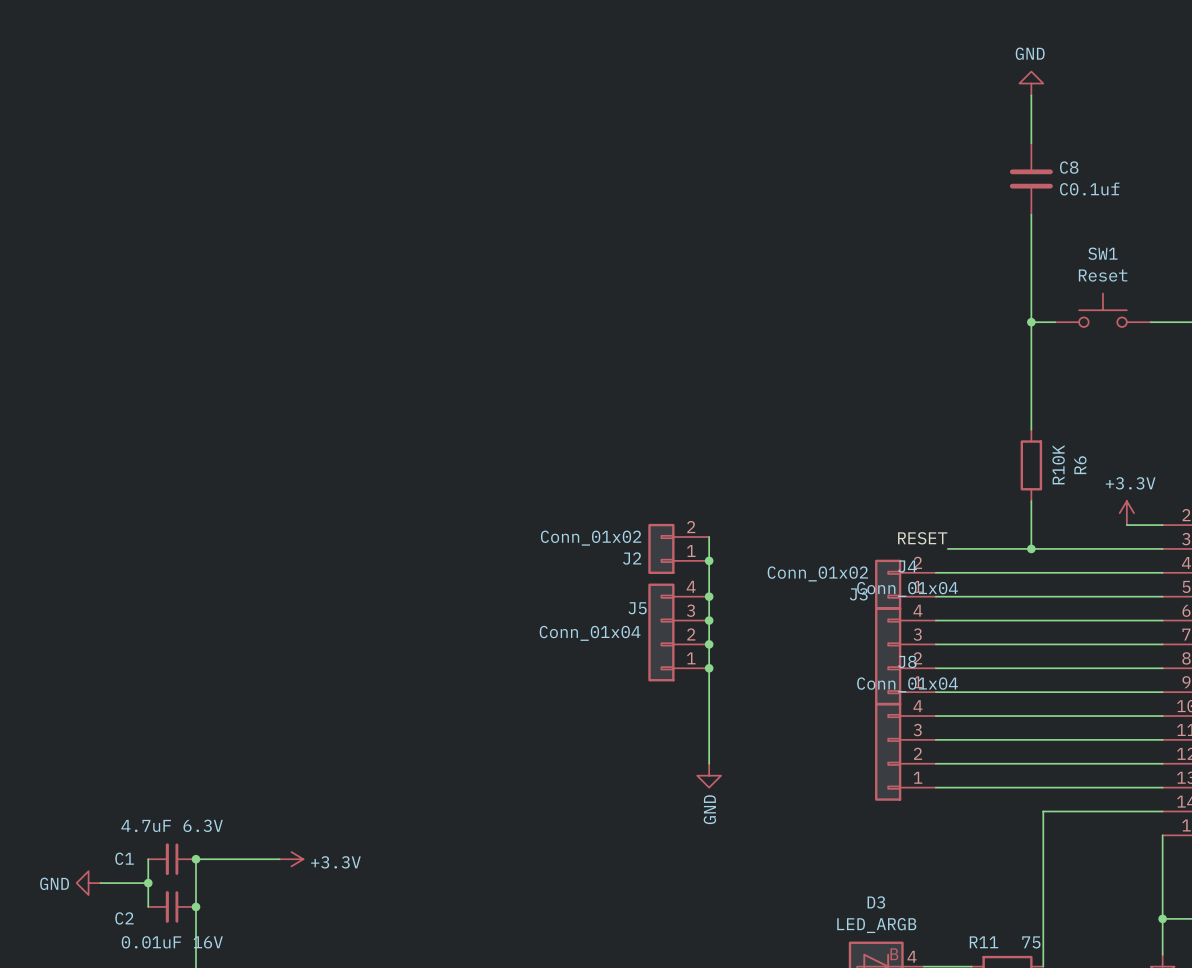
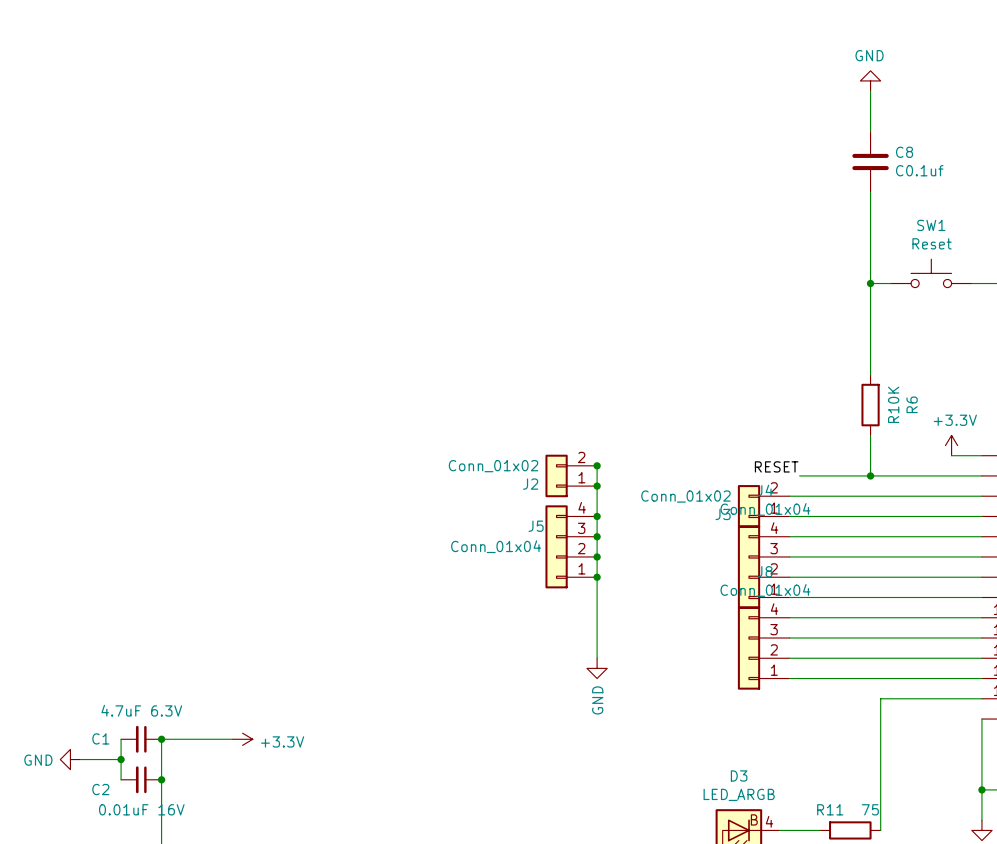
junction: none -> (597, 465)

